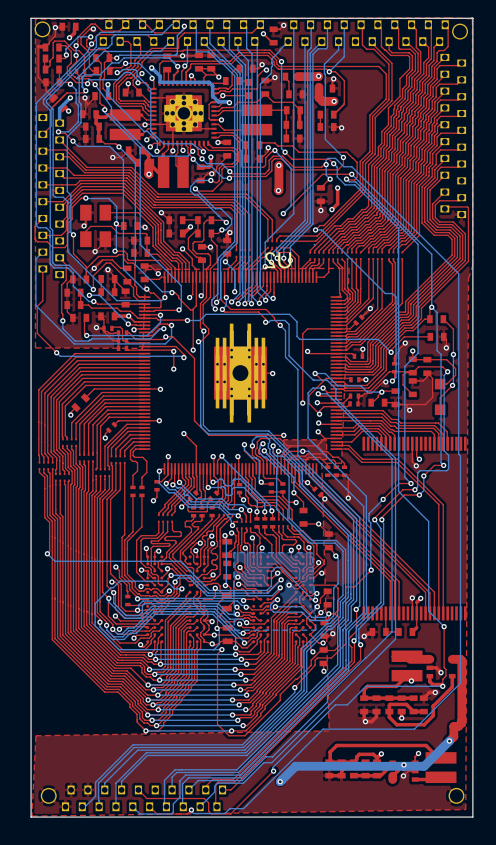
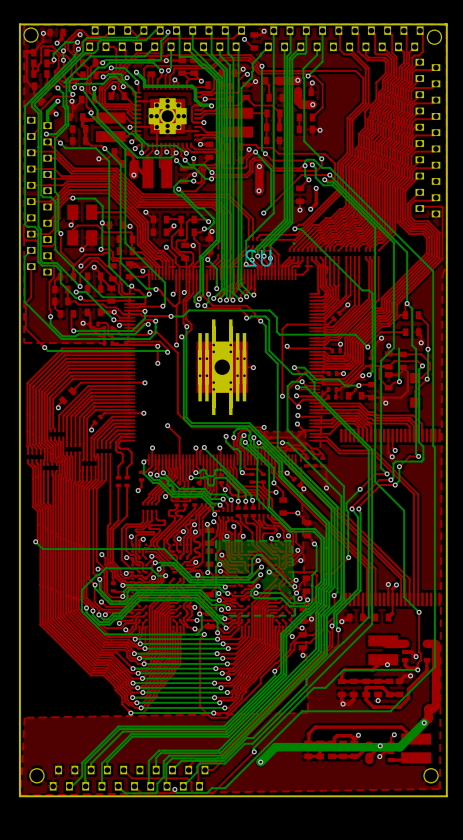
bottom track: none -> (399, 348) (399, 381)
top track: none -> (399, 381) (394, 382) (388, 387)
via: none -> (399, 381)

